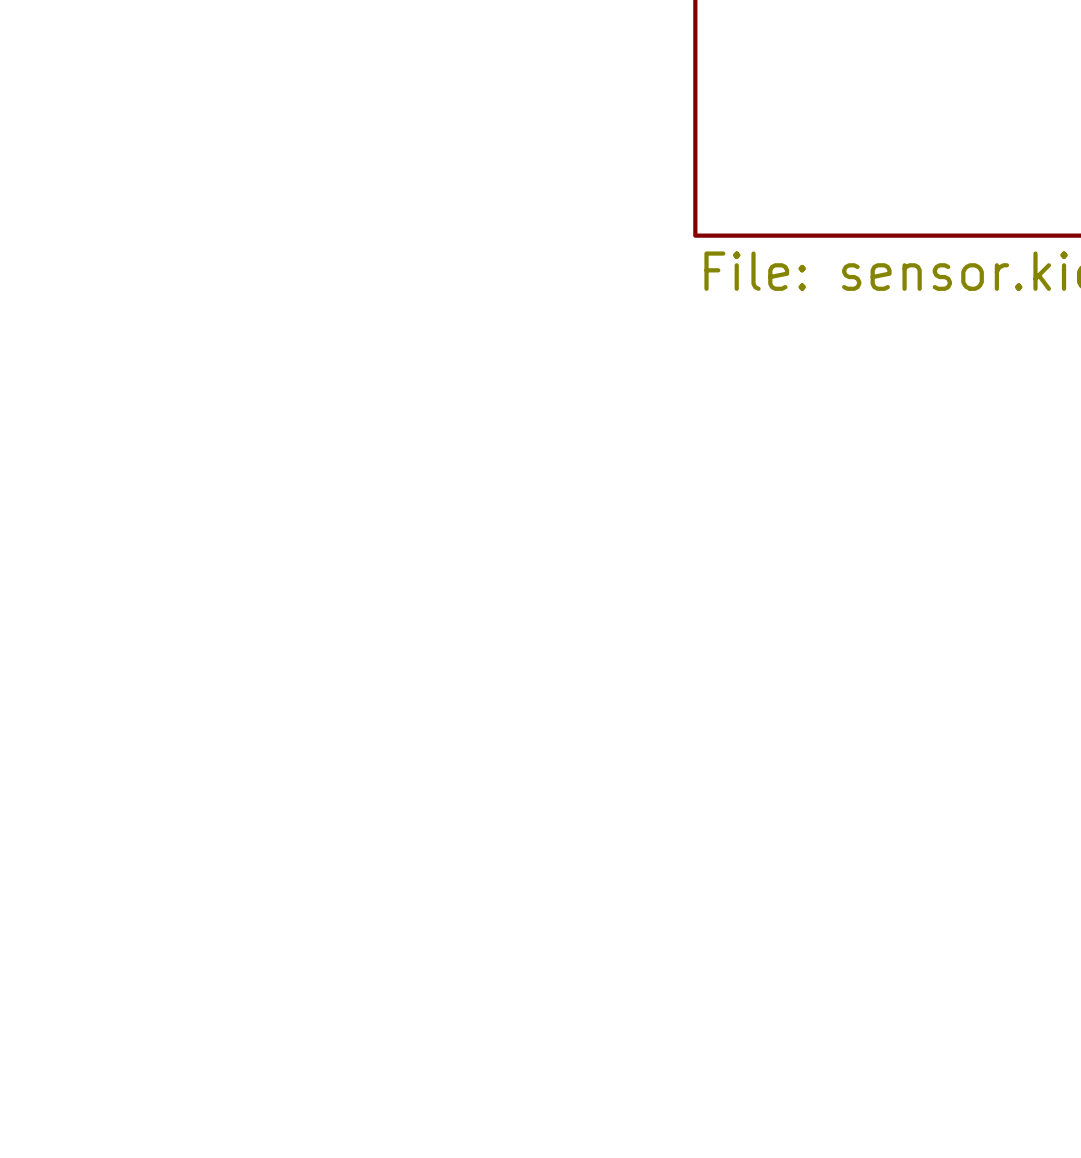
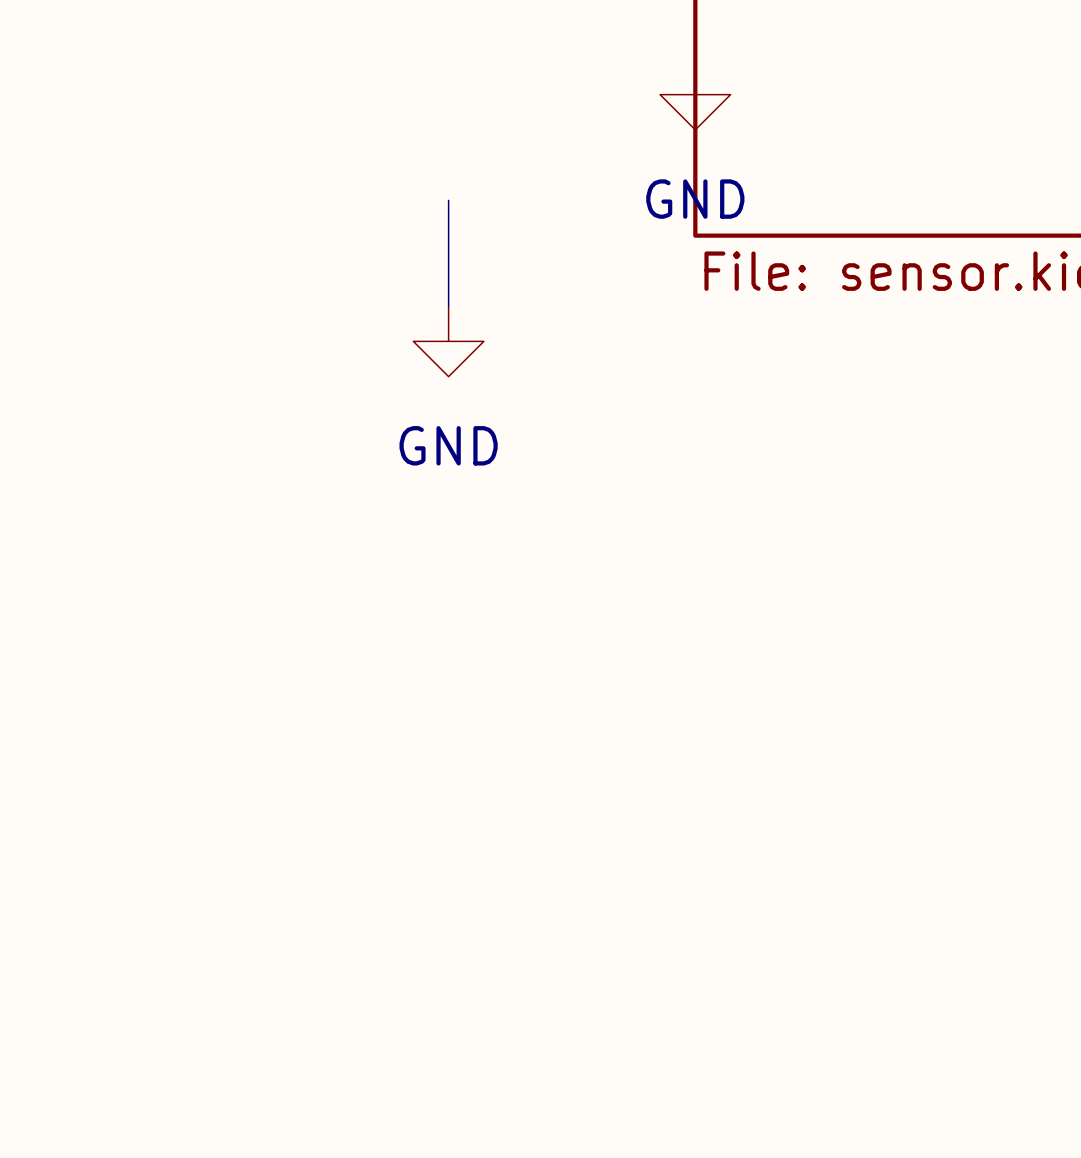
power symbol: none -> GND (695, 94)
wire: none -> (448, 200) (448, 306)
power symbol: none -> GND (448, 341)

